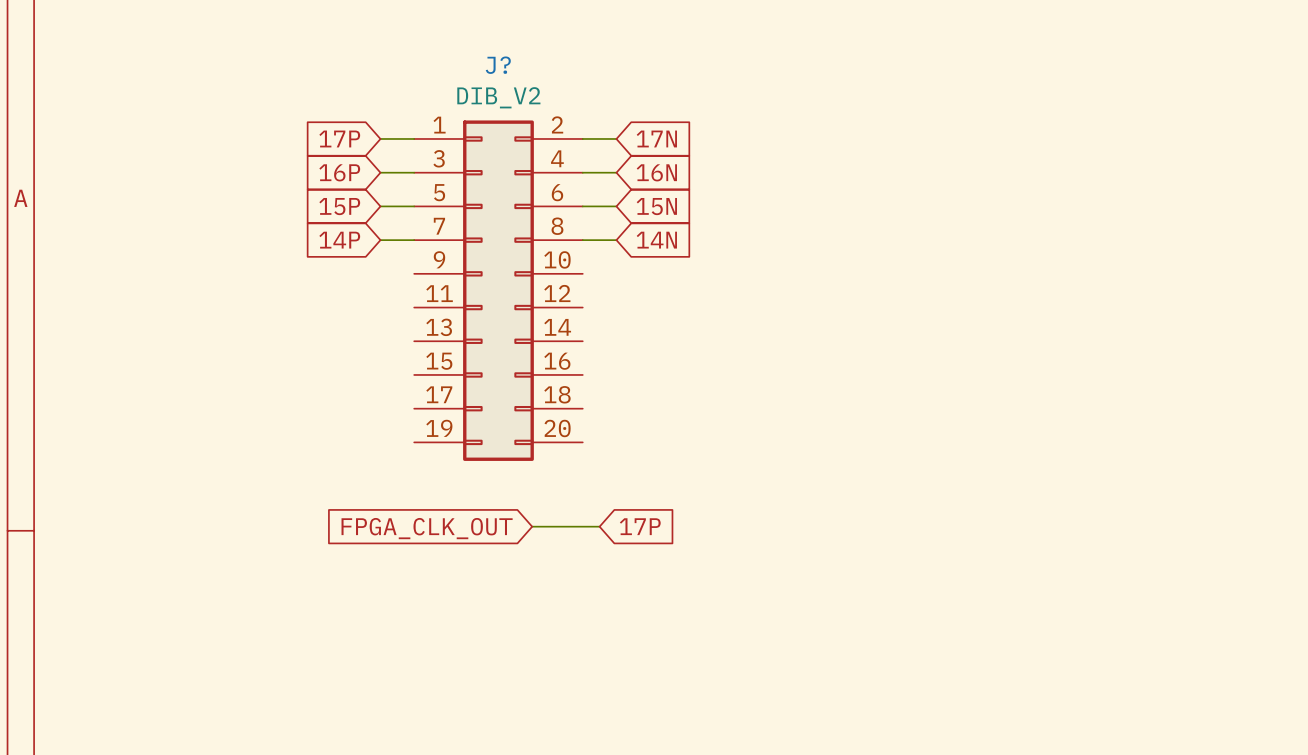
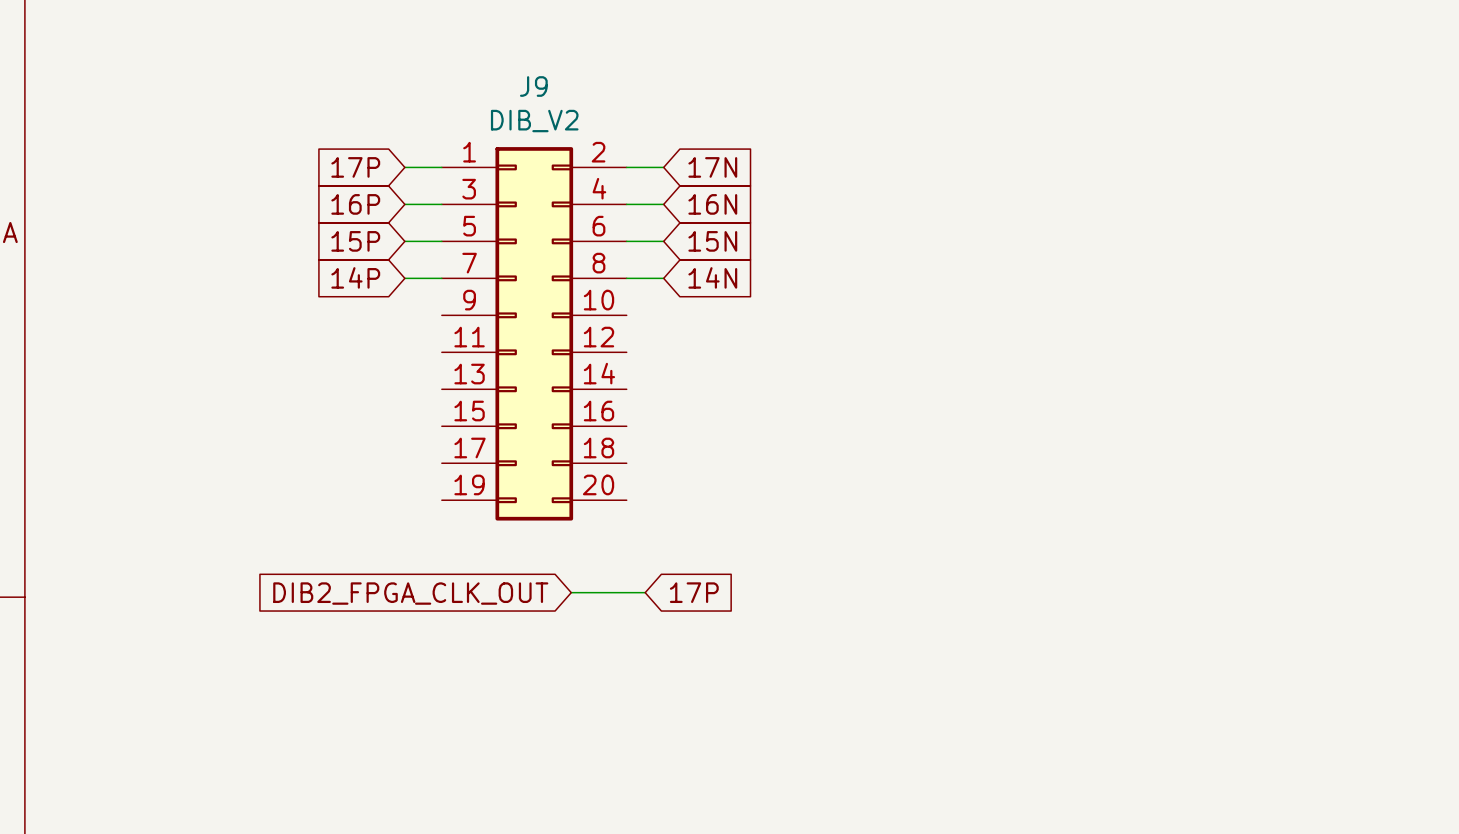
J? name: J? (498, 65) -> J9 (533, 86)
global label: FPGA_CLK_OUT (427, 528) -> DIB2_FPGA_CLK_OUT (410, 593)

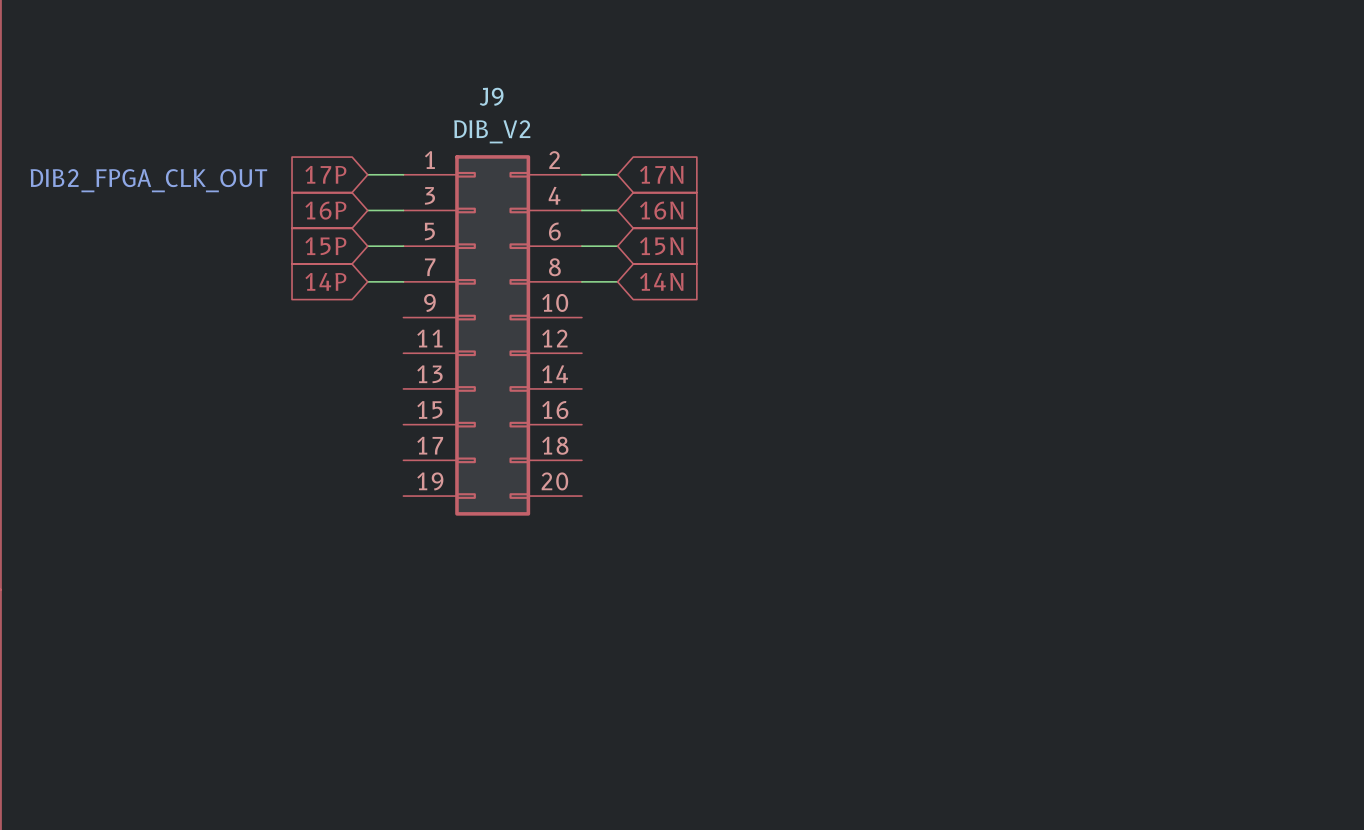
text: none -> DIB2_FPGA_CLK_OUT (148, 180)
wire: (571, 592) (645, 592) -> none
global label: 17P (694, 592) -> none
global label: DIB2_FPGA_CLK_OUT (410, 593) -> none

